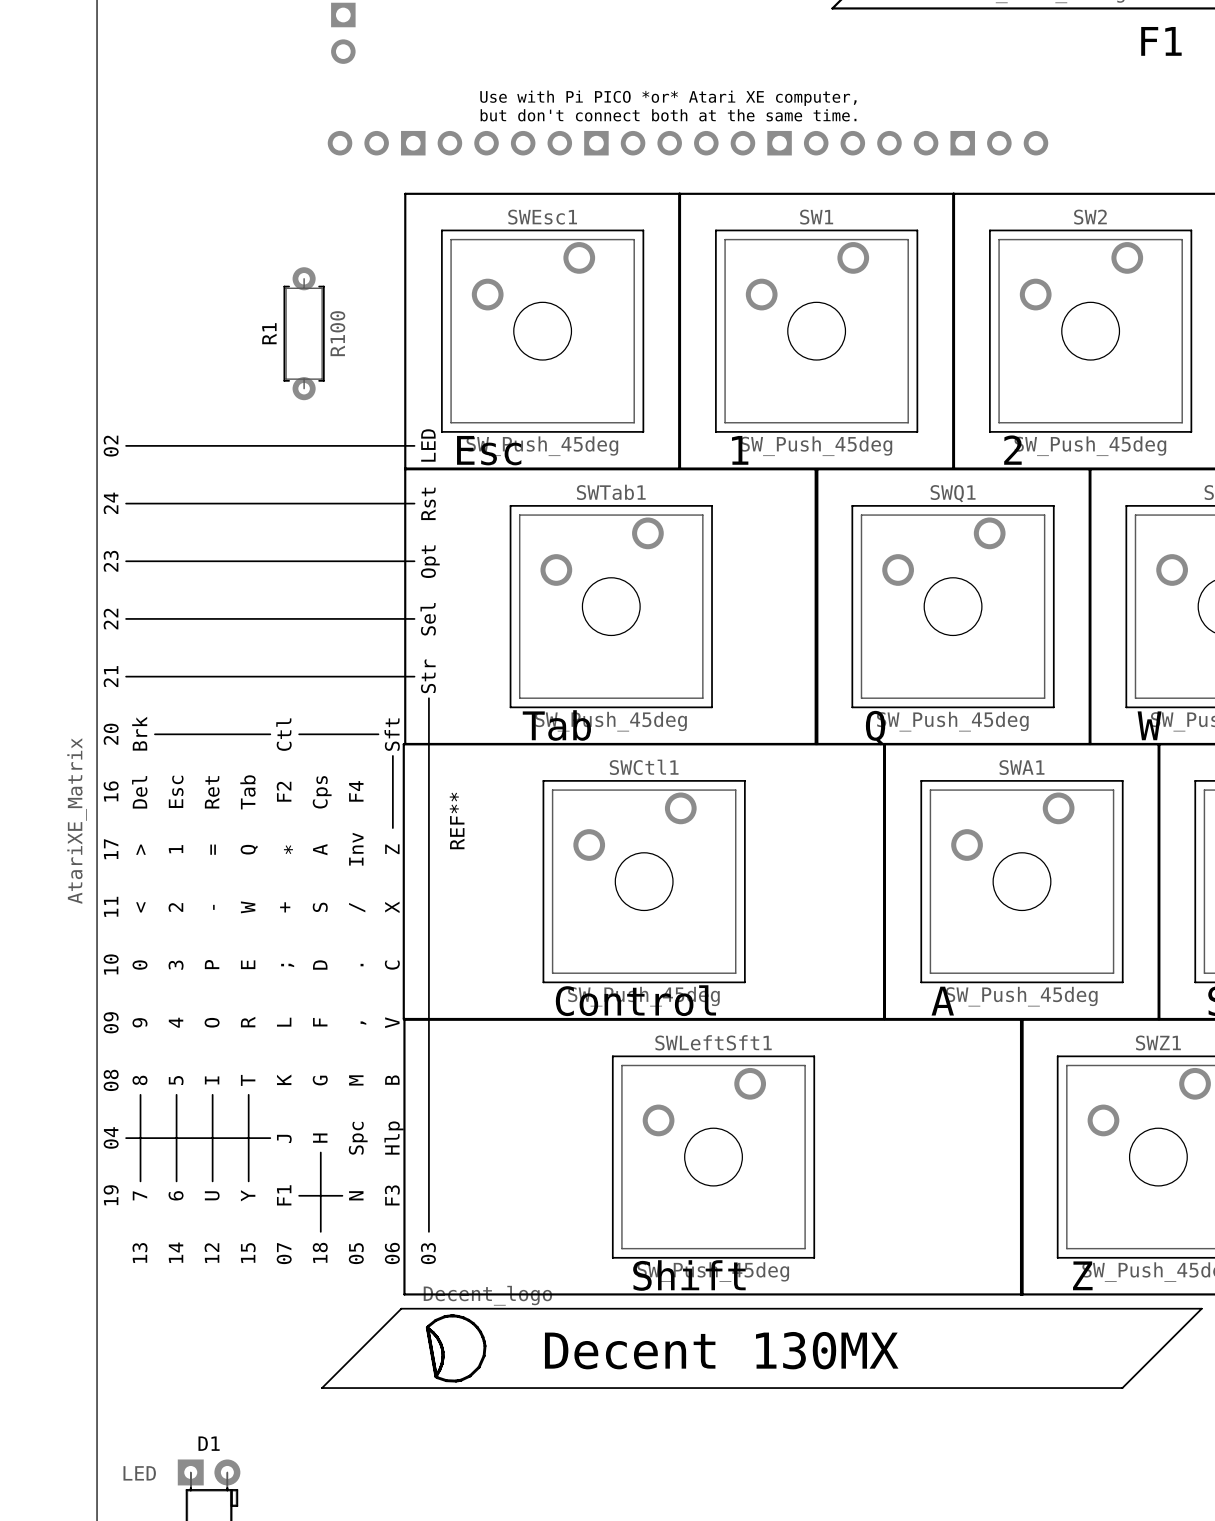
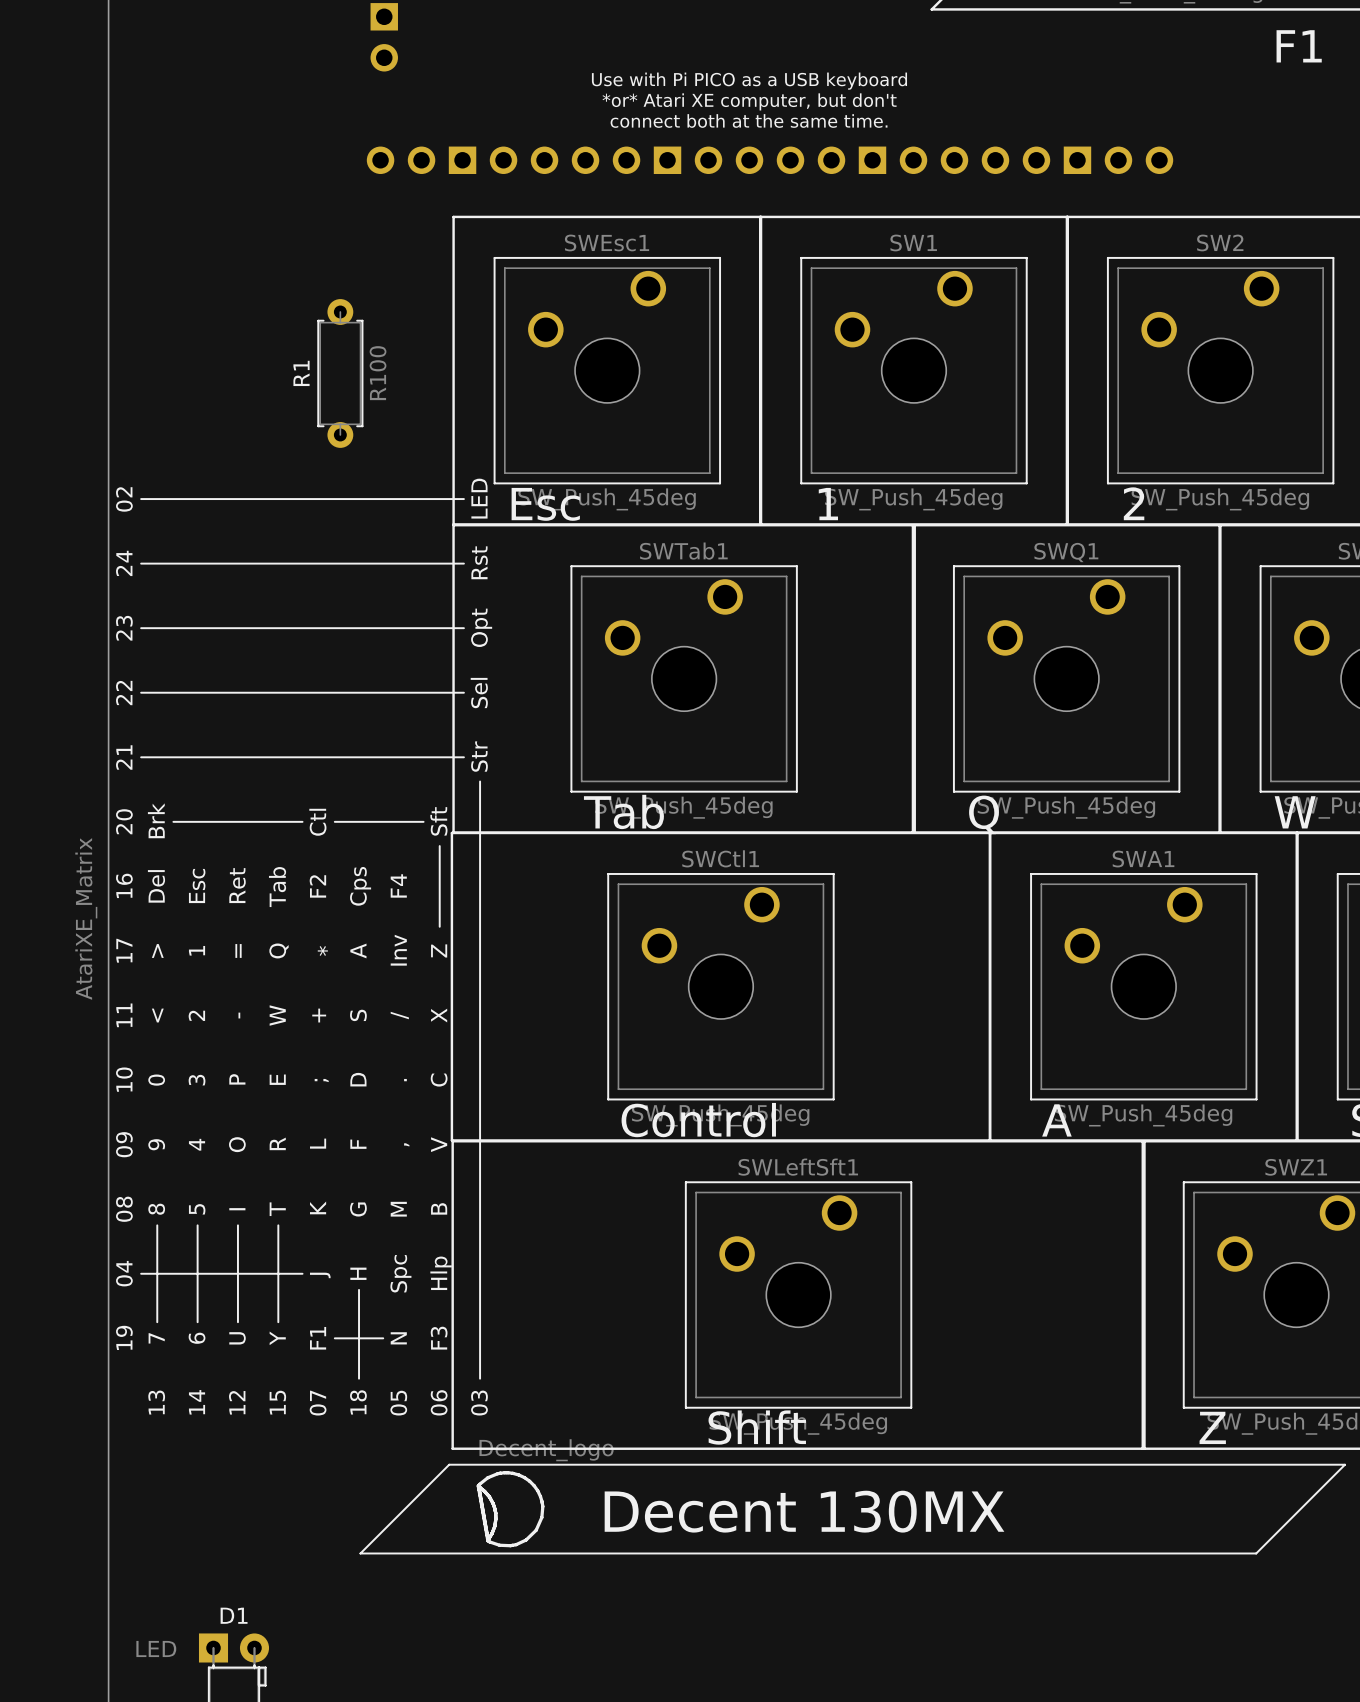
text: none -> Use with Pi PICO as a USB keyboard (749, 81)
text: Use with Pi PICO *or* Atari XE computer, (668, 98) -> *or* Atari XE computer, but don't (749, 101)
text: but don't connect both at the same time. (668, 115) -> connect both at the same time. (749, 120)
REF**: AtariXE_Matrix (277, 838) -> none

